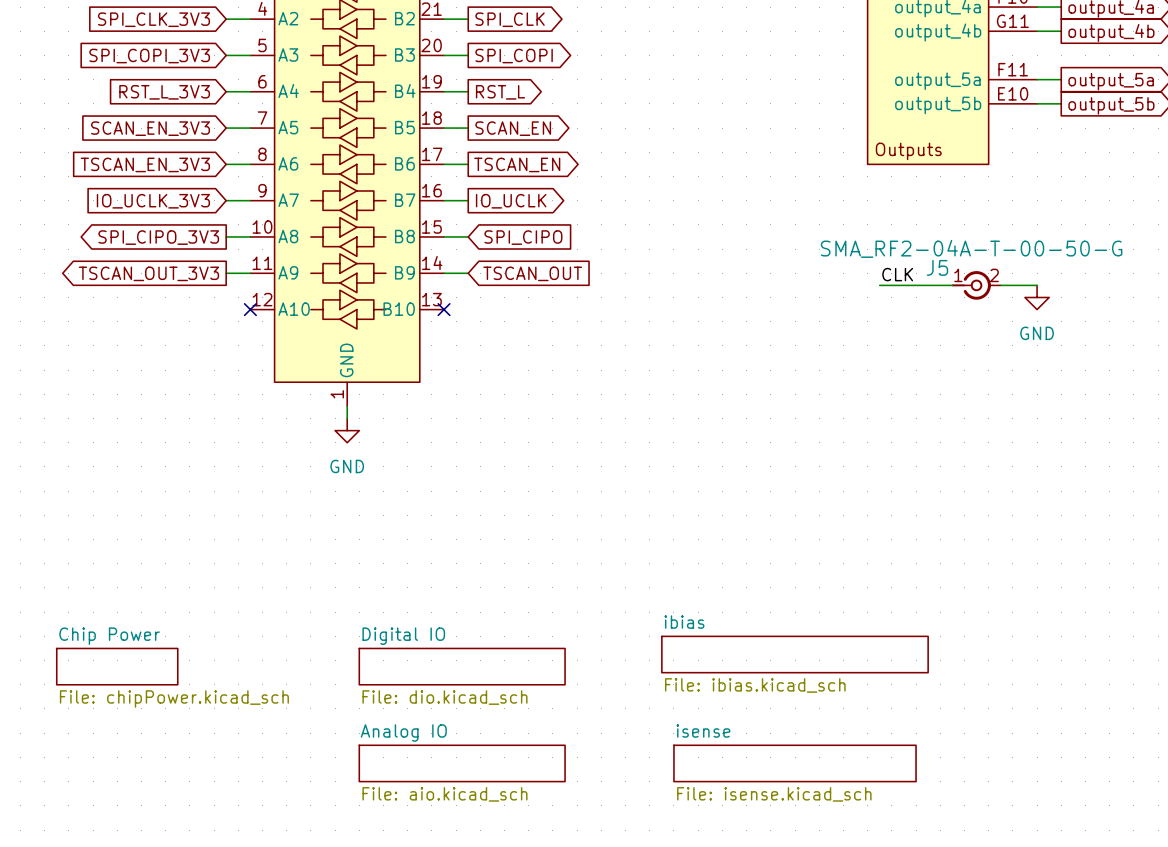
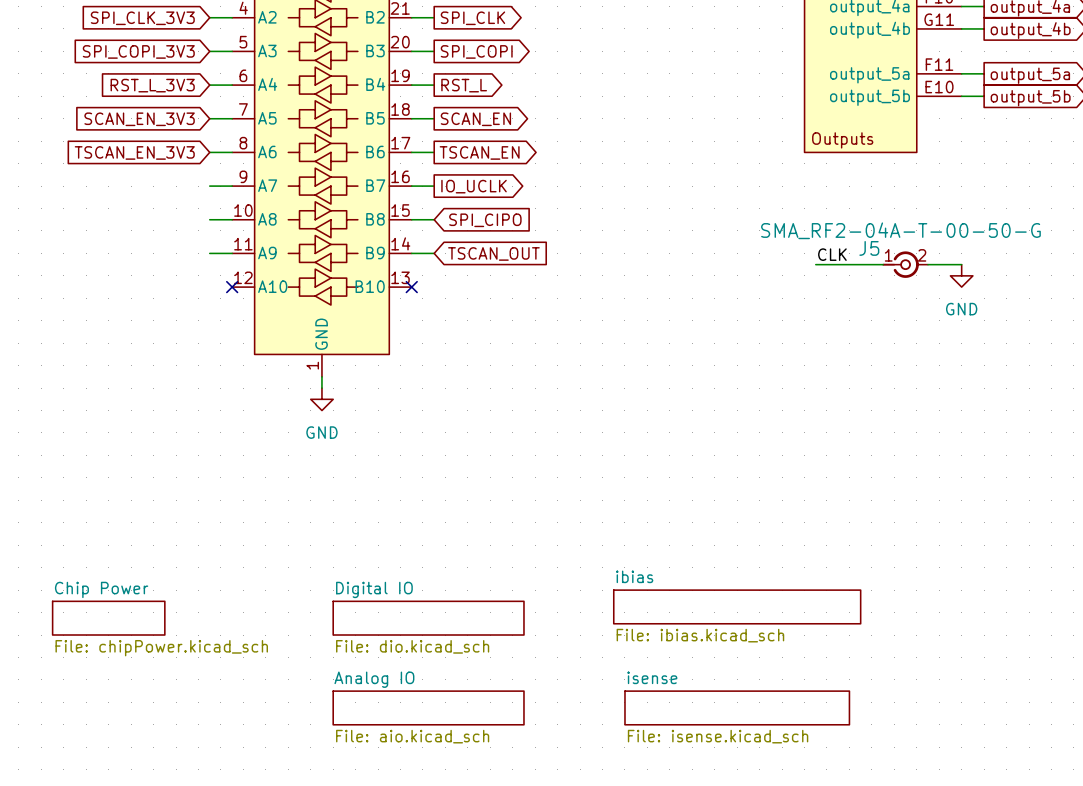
global label: IO_UCLK_3V3 (153, 201) -> none
global label: SPI_CIPO_3V3 (158, 237) -> none
global label: TSCAN_OUT_3V3 (148, 273) -> none

